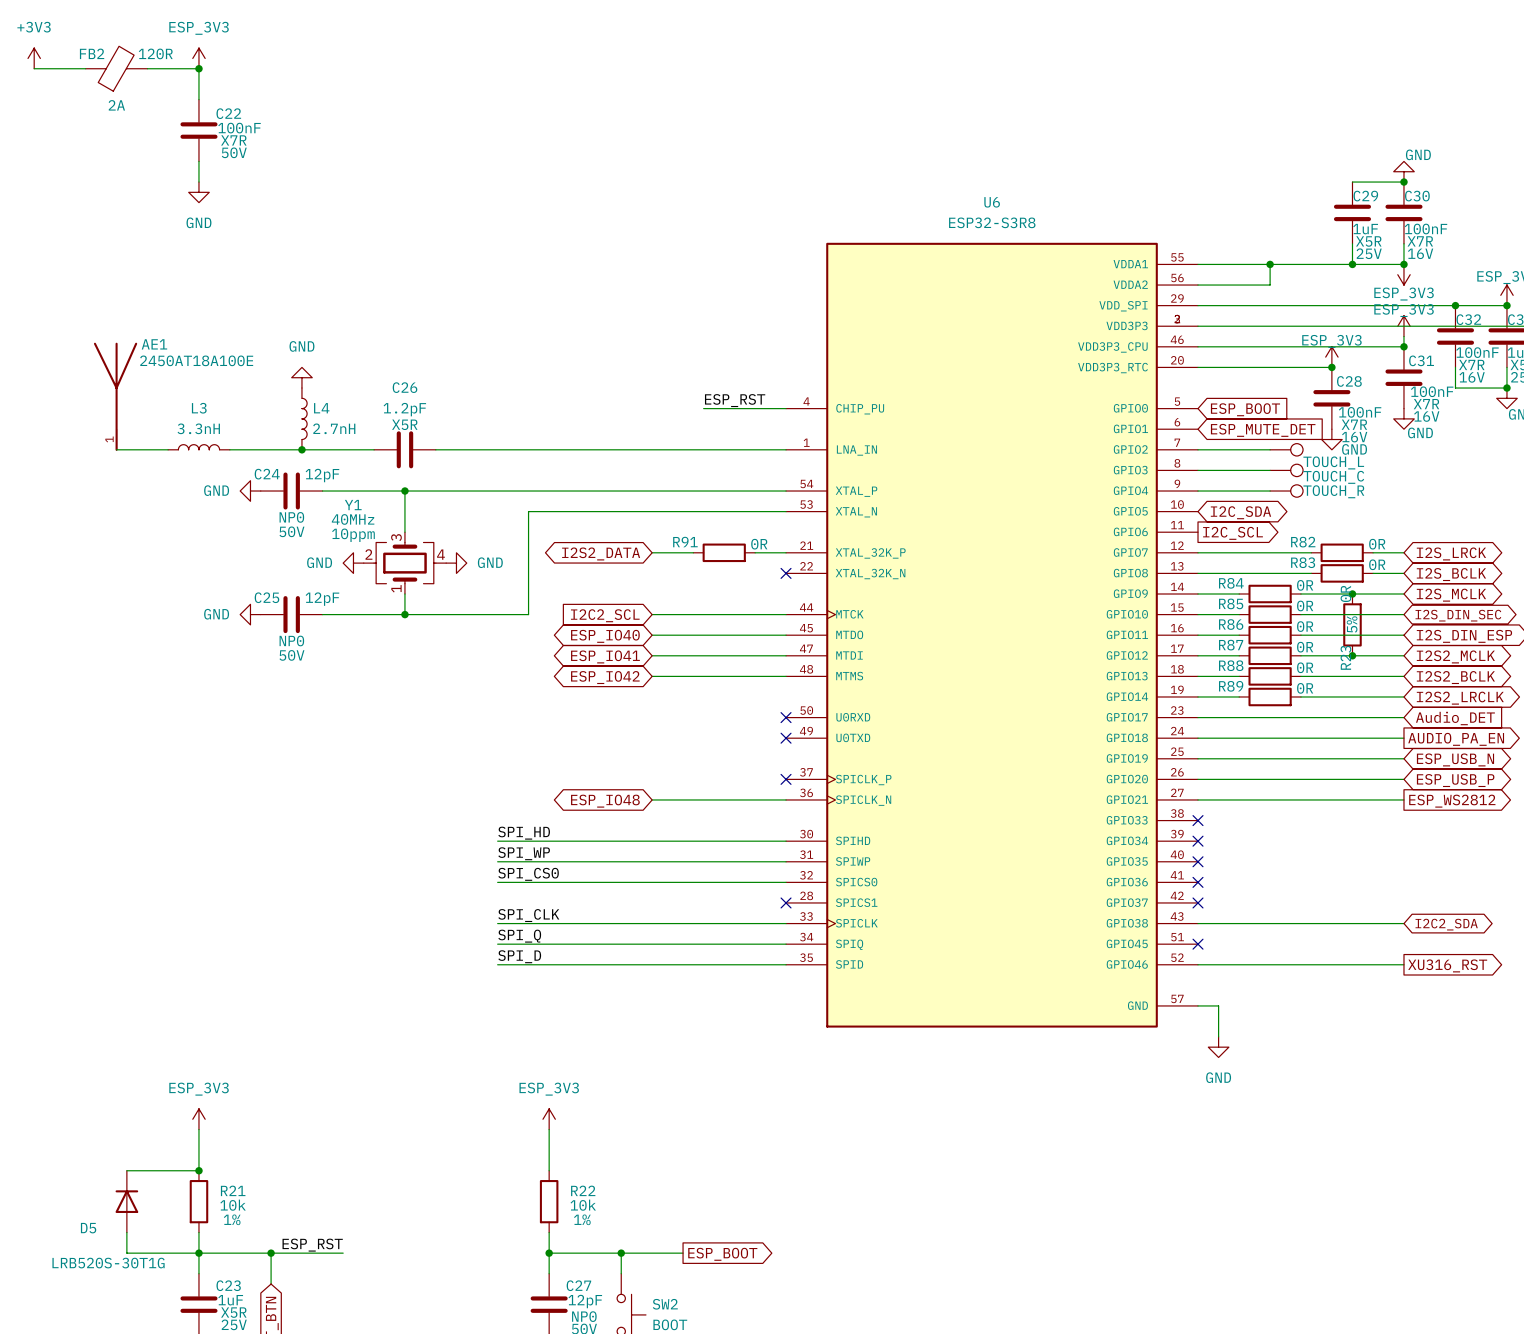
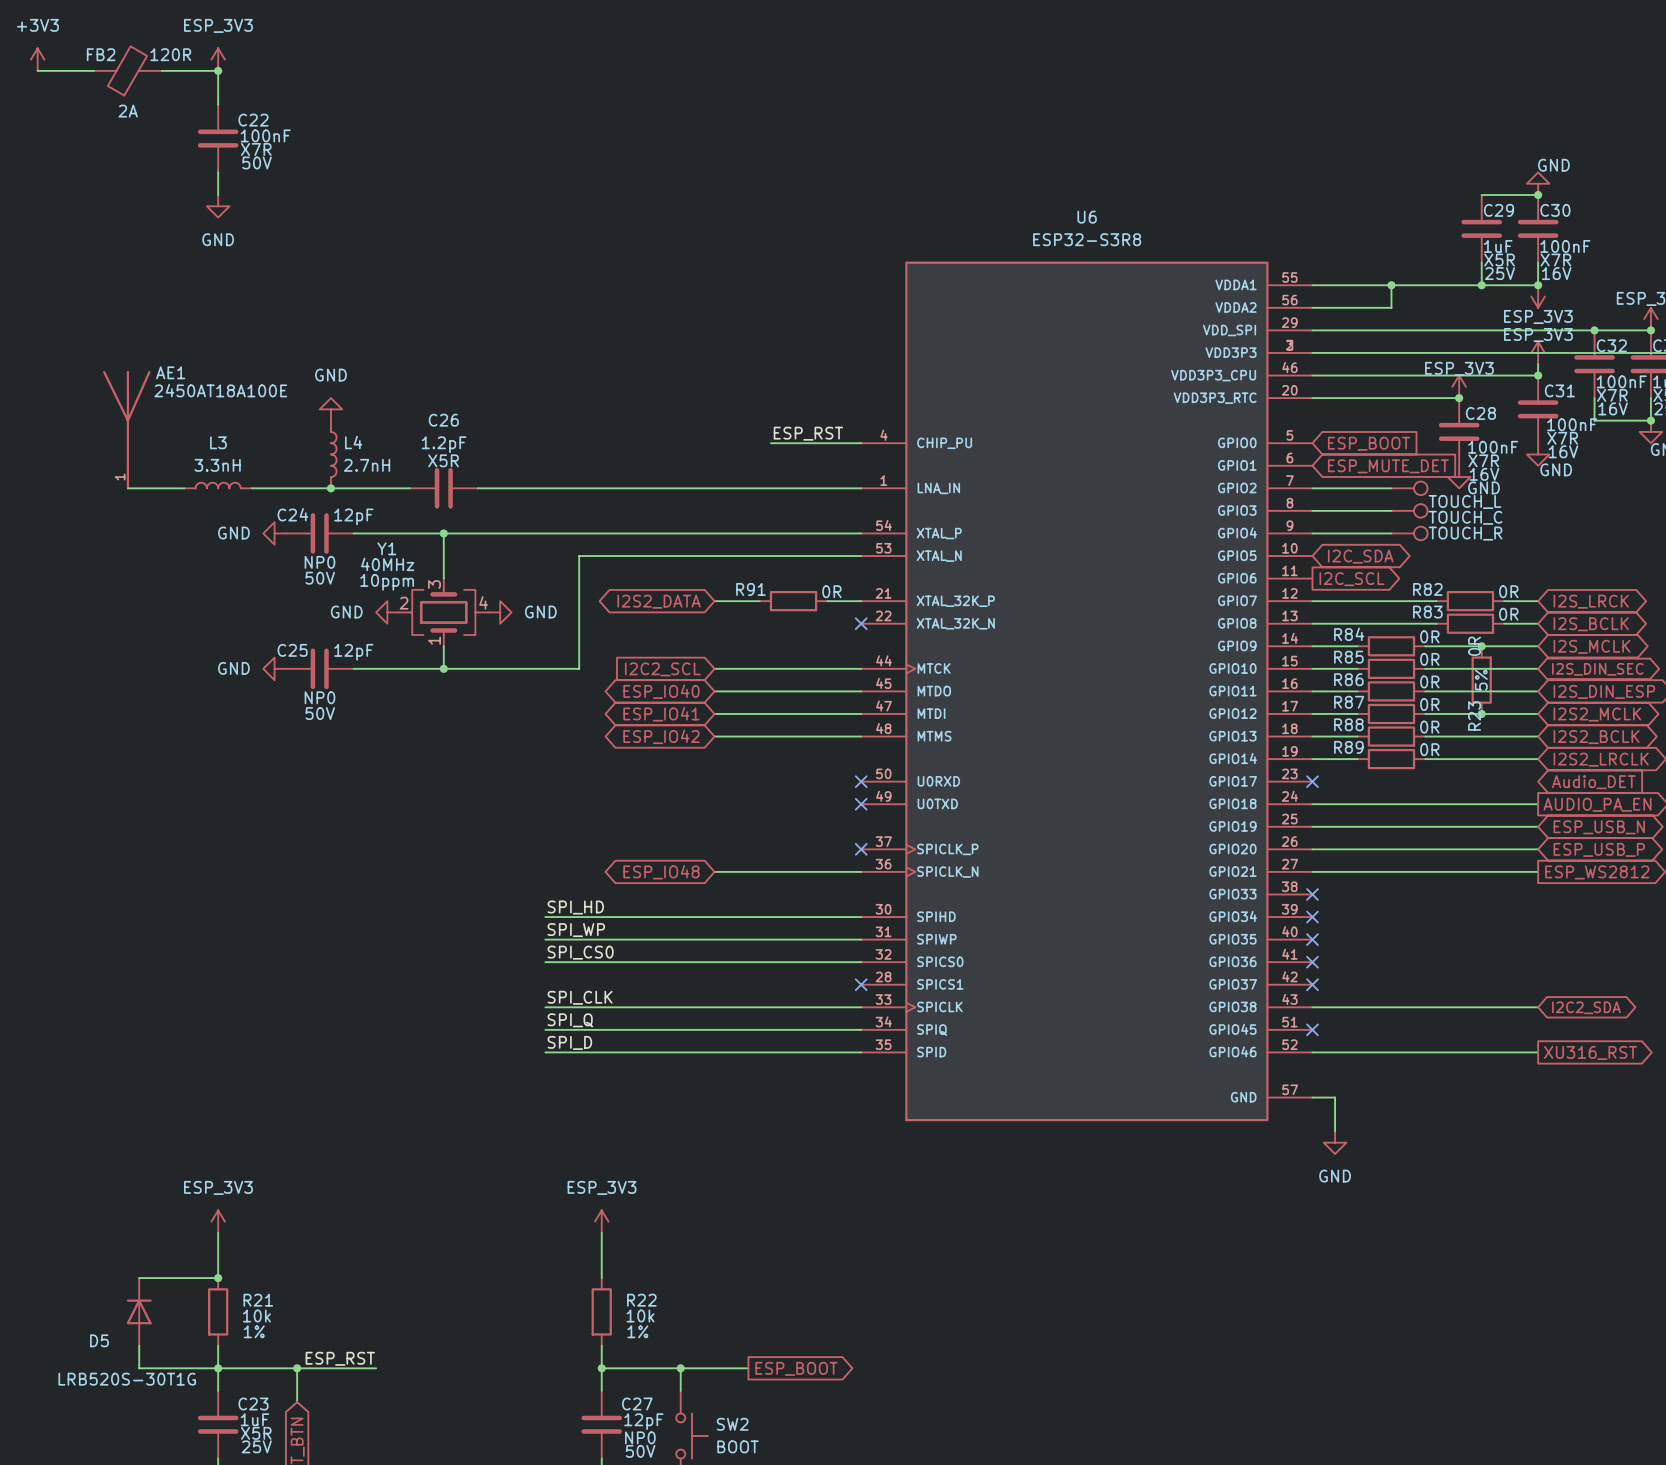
wire: (1198, 717) (1403, 717) -> none
no-connect mark: none -> (1312, 781)

